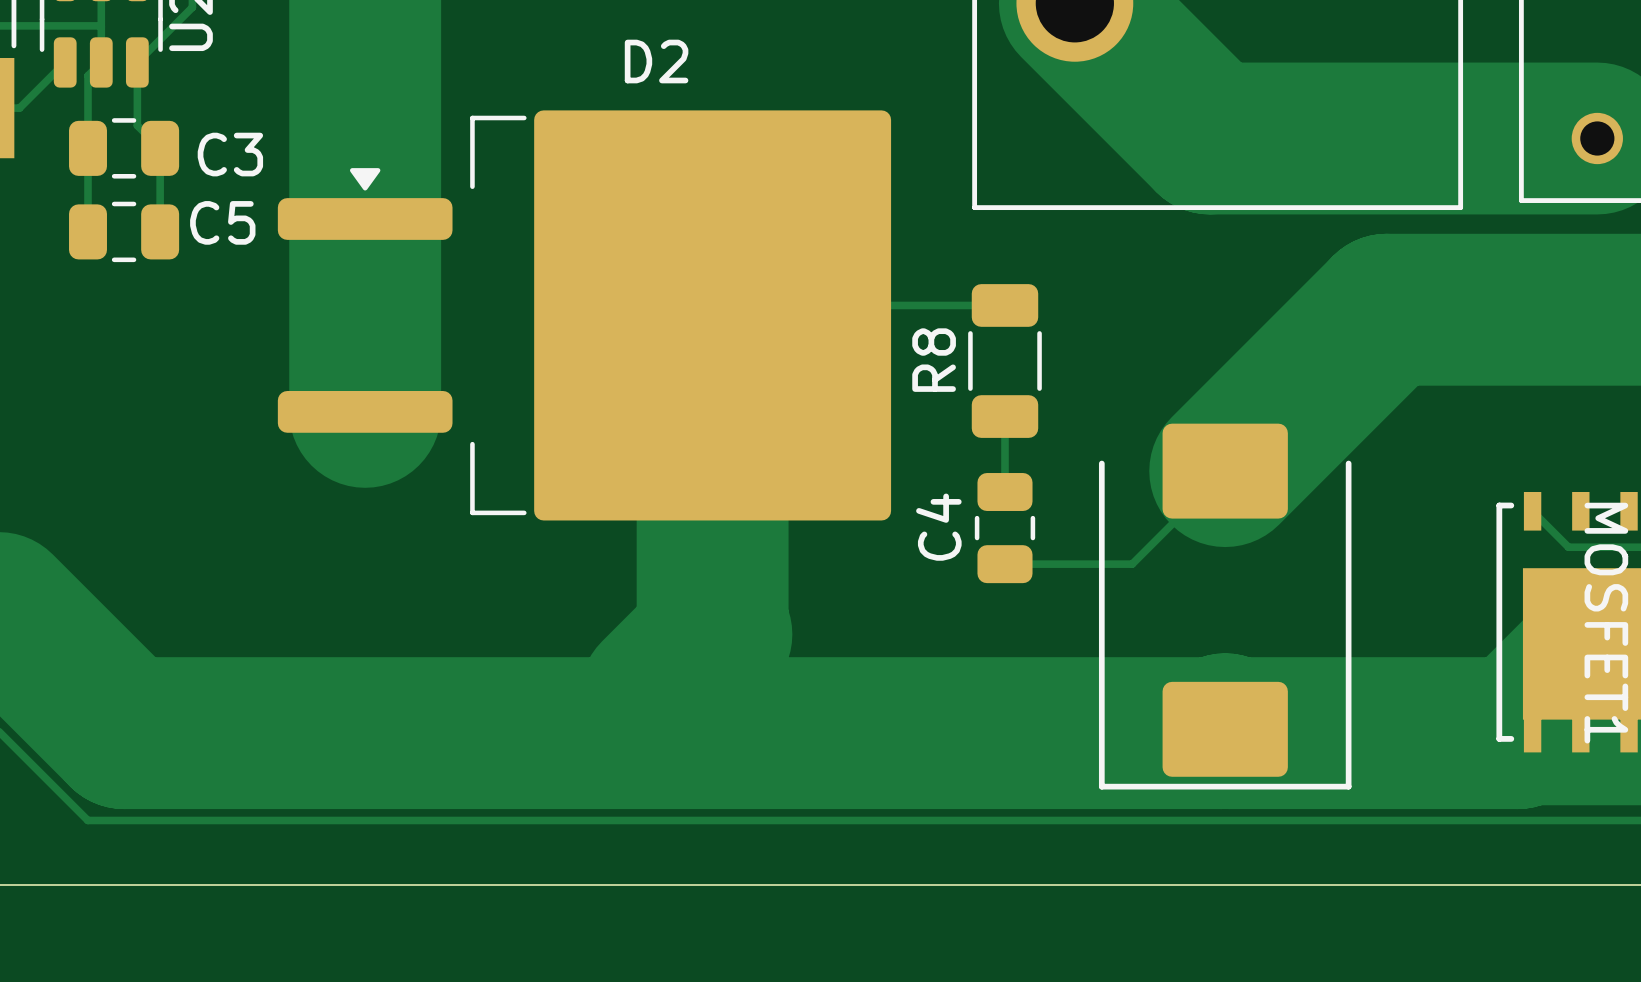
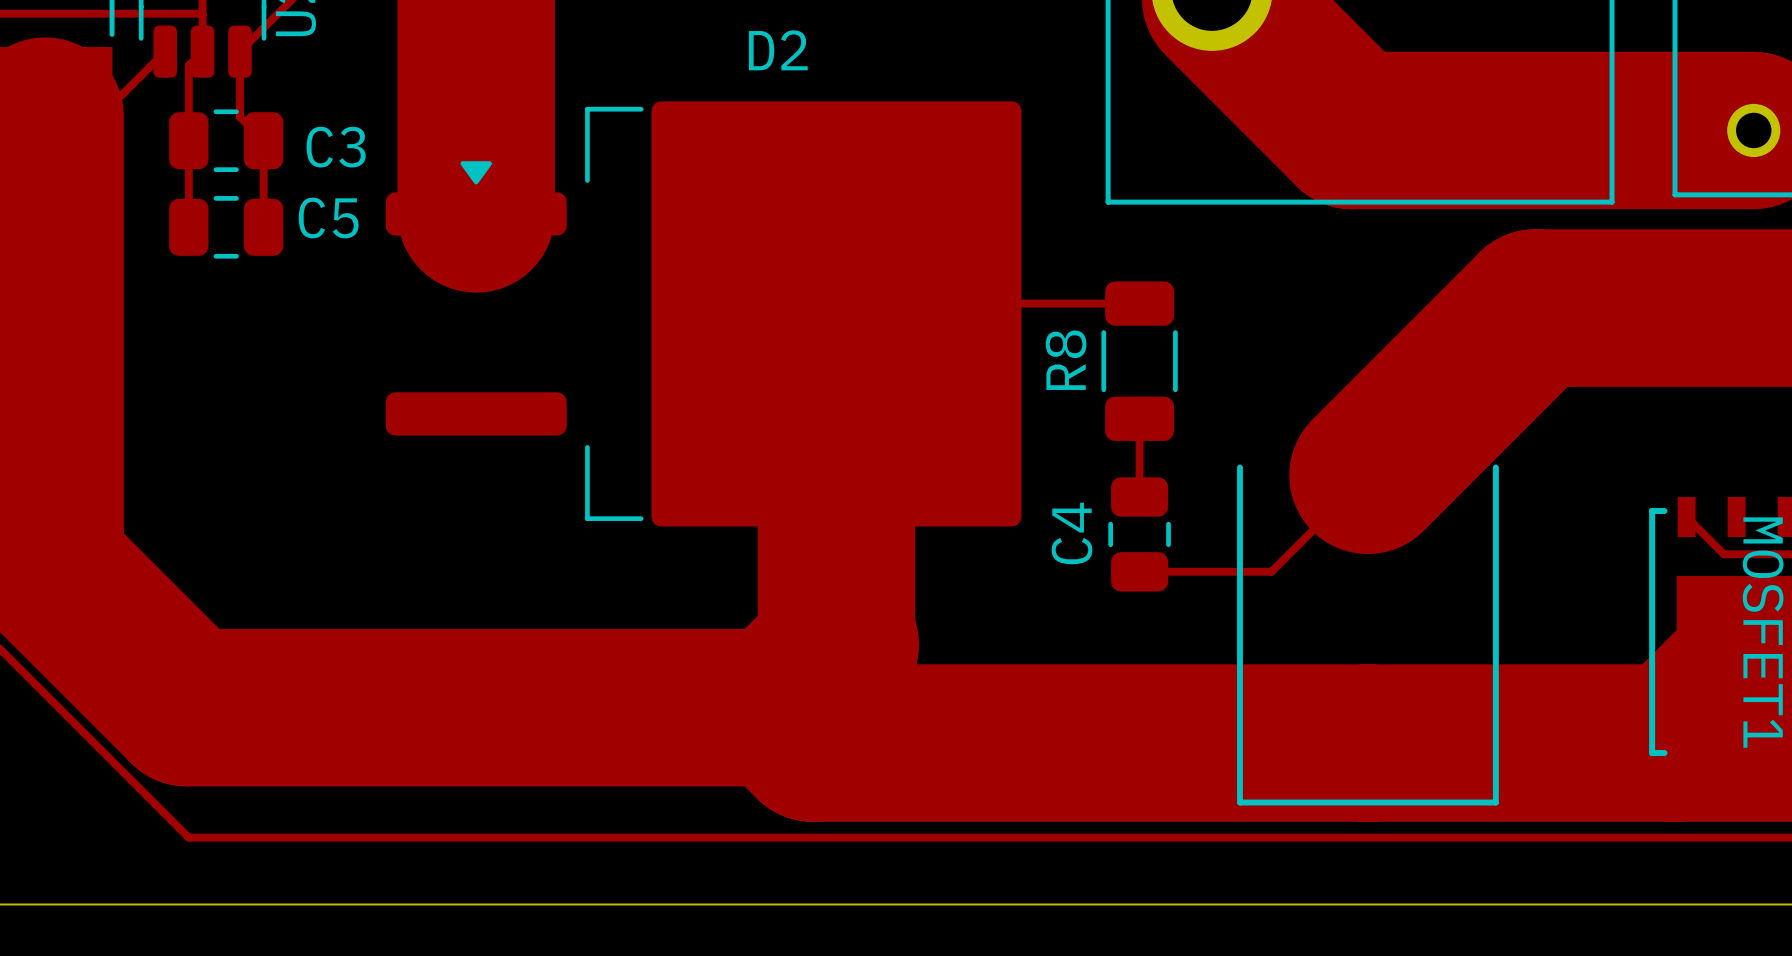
track: (365, 218) (365, 411) -> none
track: (86, 695) (124, 733) (1221, 733) (1225, 729) (1229, 733) (1517, 733) (1521, 729) -> (186, 707) (777, 707) (812, 743) (1675, 743)

